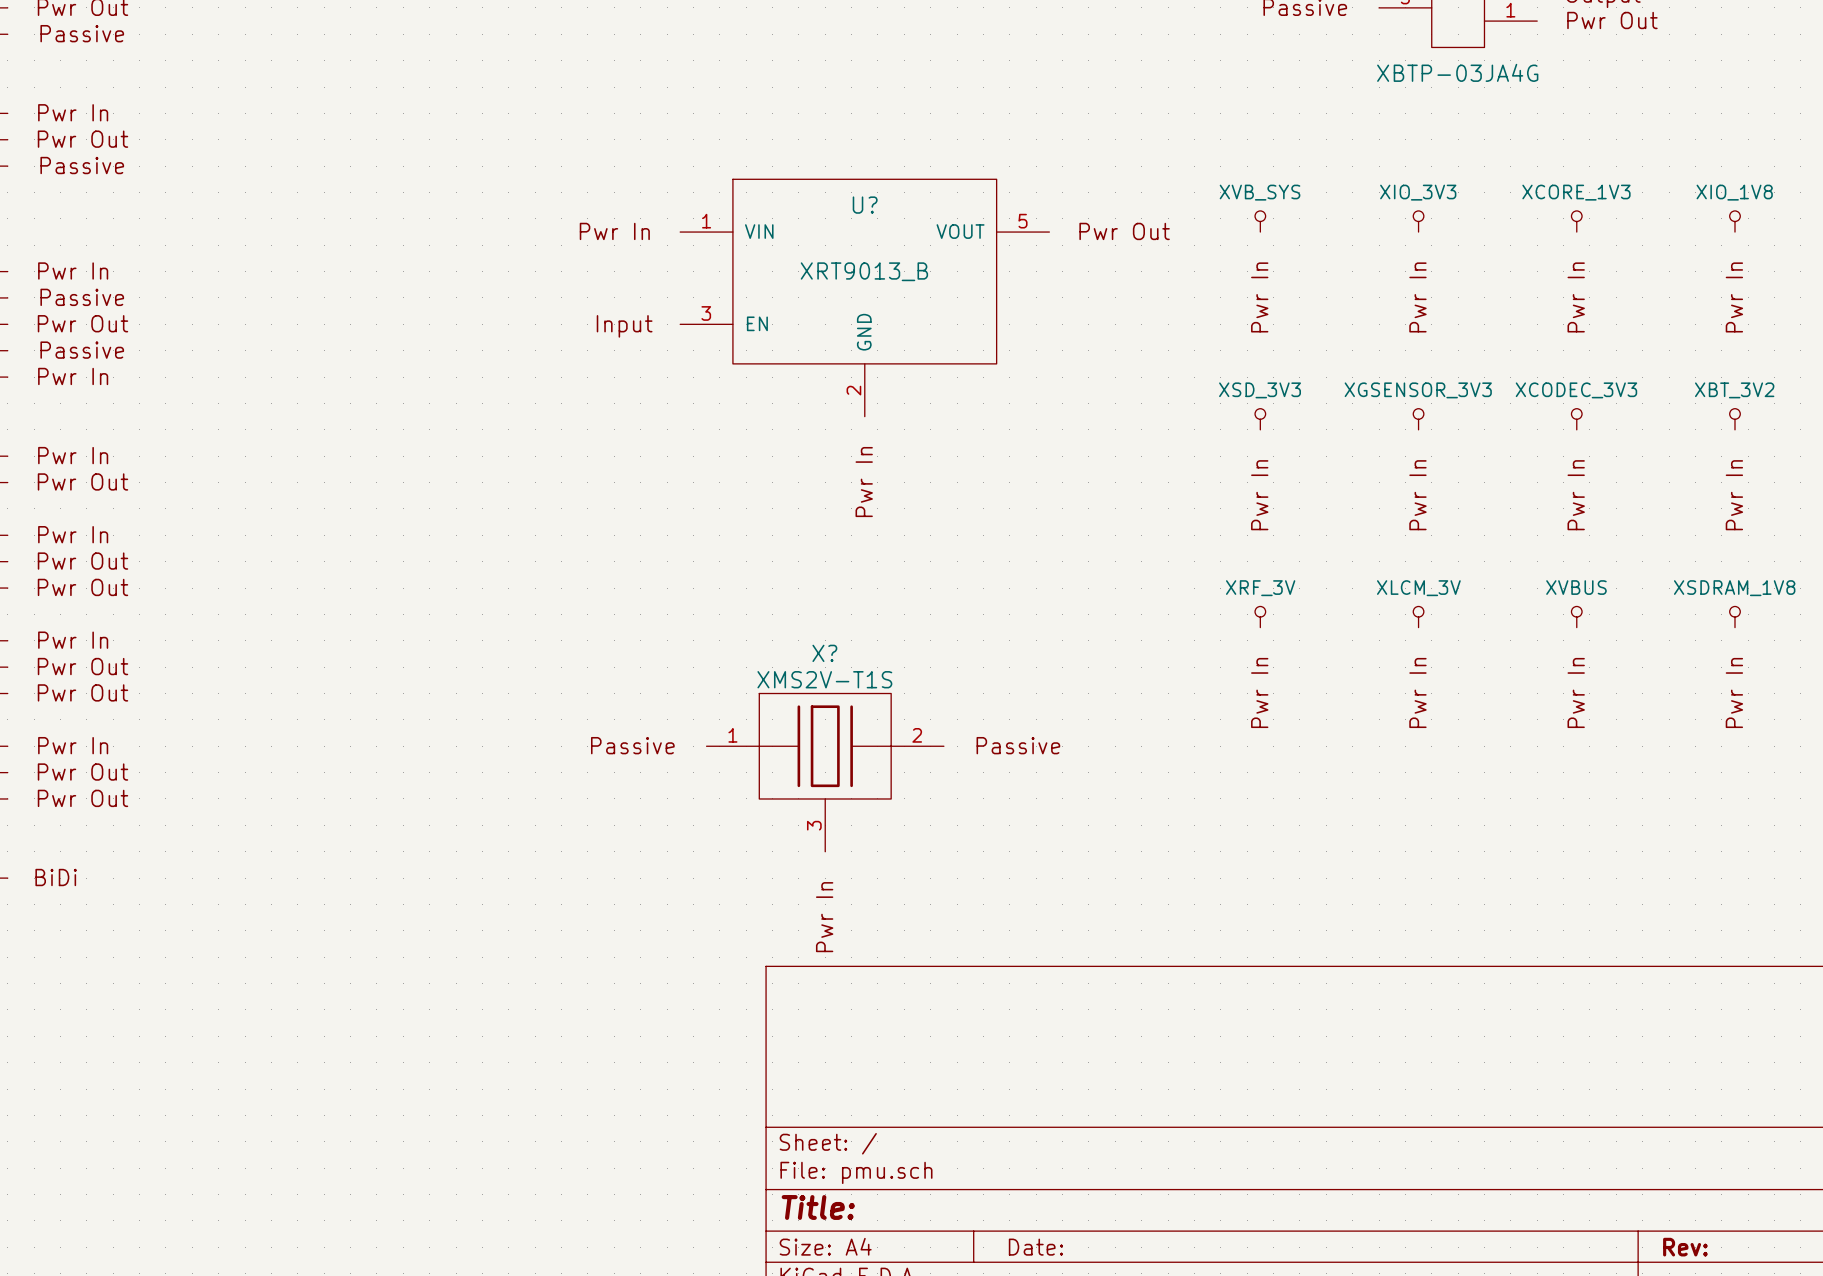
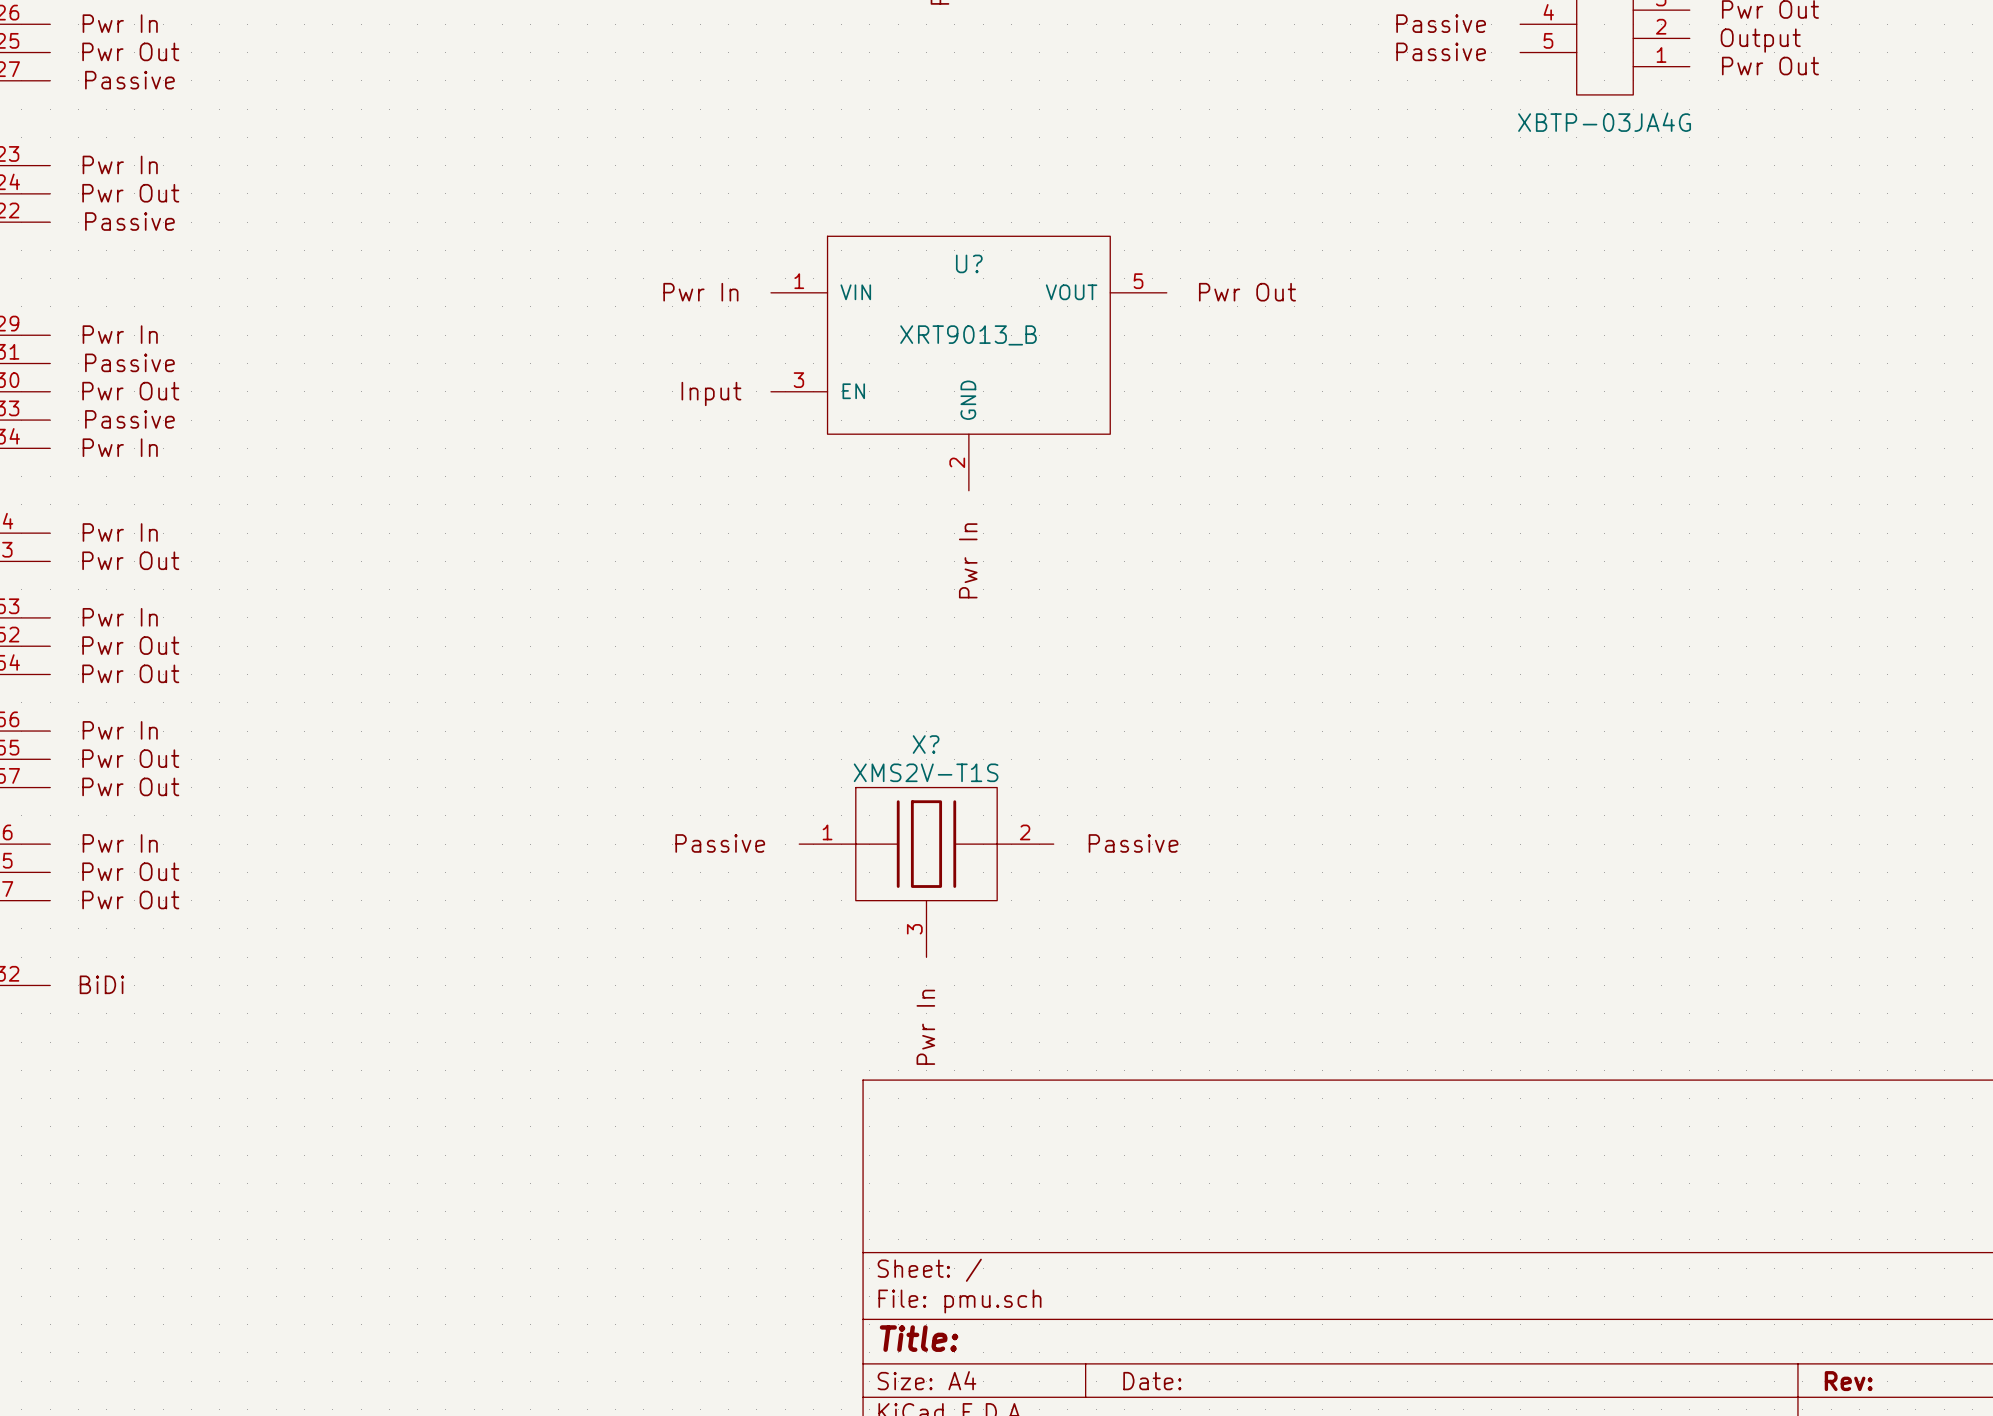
power symbol: XVB_SYS (1260, 221) -> none
power symbol: XIO_3V3 (1418, 221) -> none
power symbol: XCORE_1V3 (1576, 221) -> none
power symbol: XIO_1V8 (1734, 221) -> none
power symbol: XSD_3V3 (1260, 419) -> none
power symbol: XGSENSOR_3V3 (1418, 419) -> none
power symbol: XCODEC_3V3 (1576, 419) -> none
power symbol: XBT_3V2 (1734, 419) -> none
power symbol: XRF_3V (1260, 617) -> none
power symbol: XLCM_3V (1418, 617) -> none
power symbol: XVBUS (1576, 617) -> none
power symbol: XSDRAM_1V8 (1734, 617) -> none

